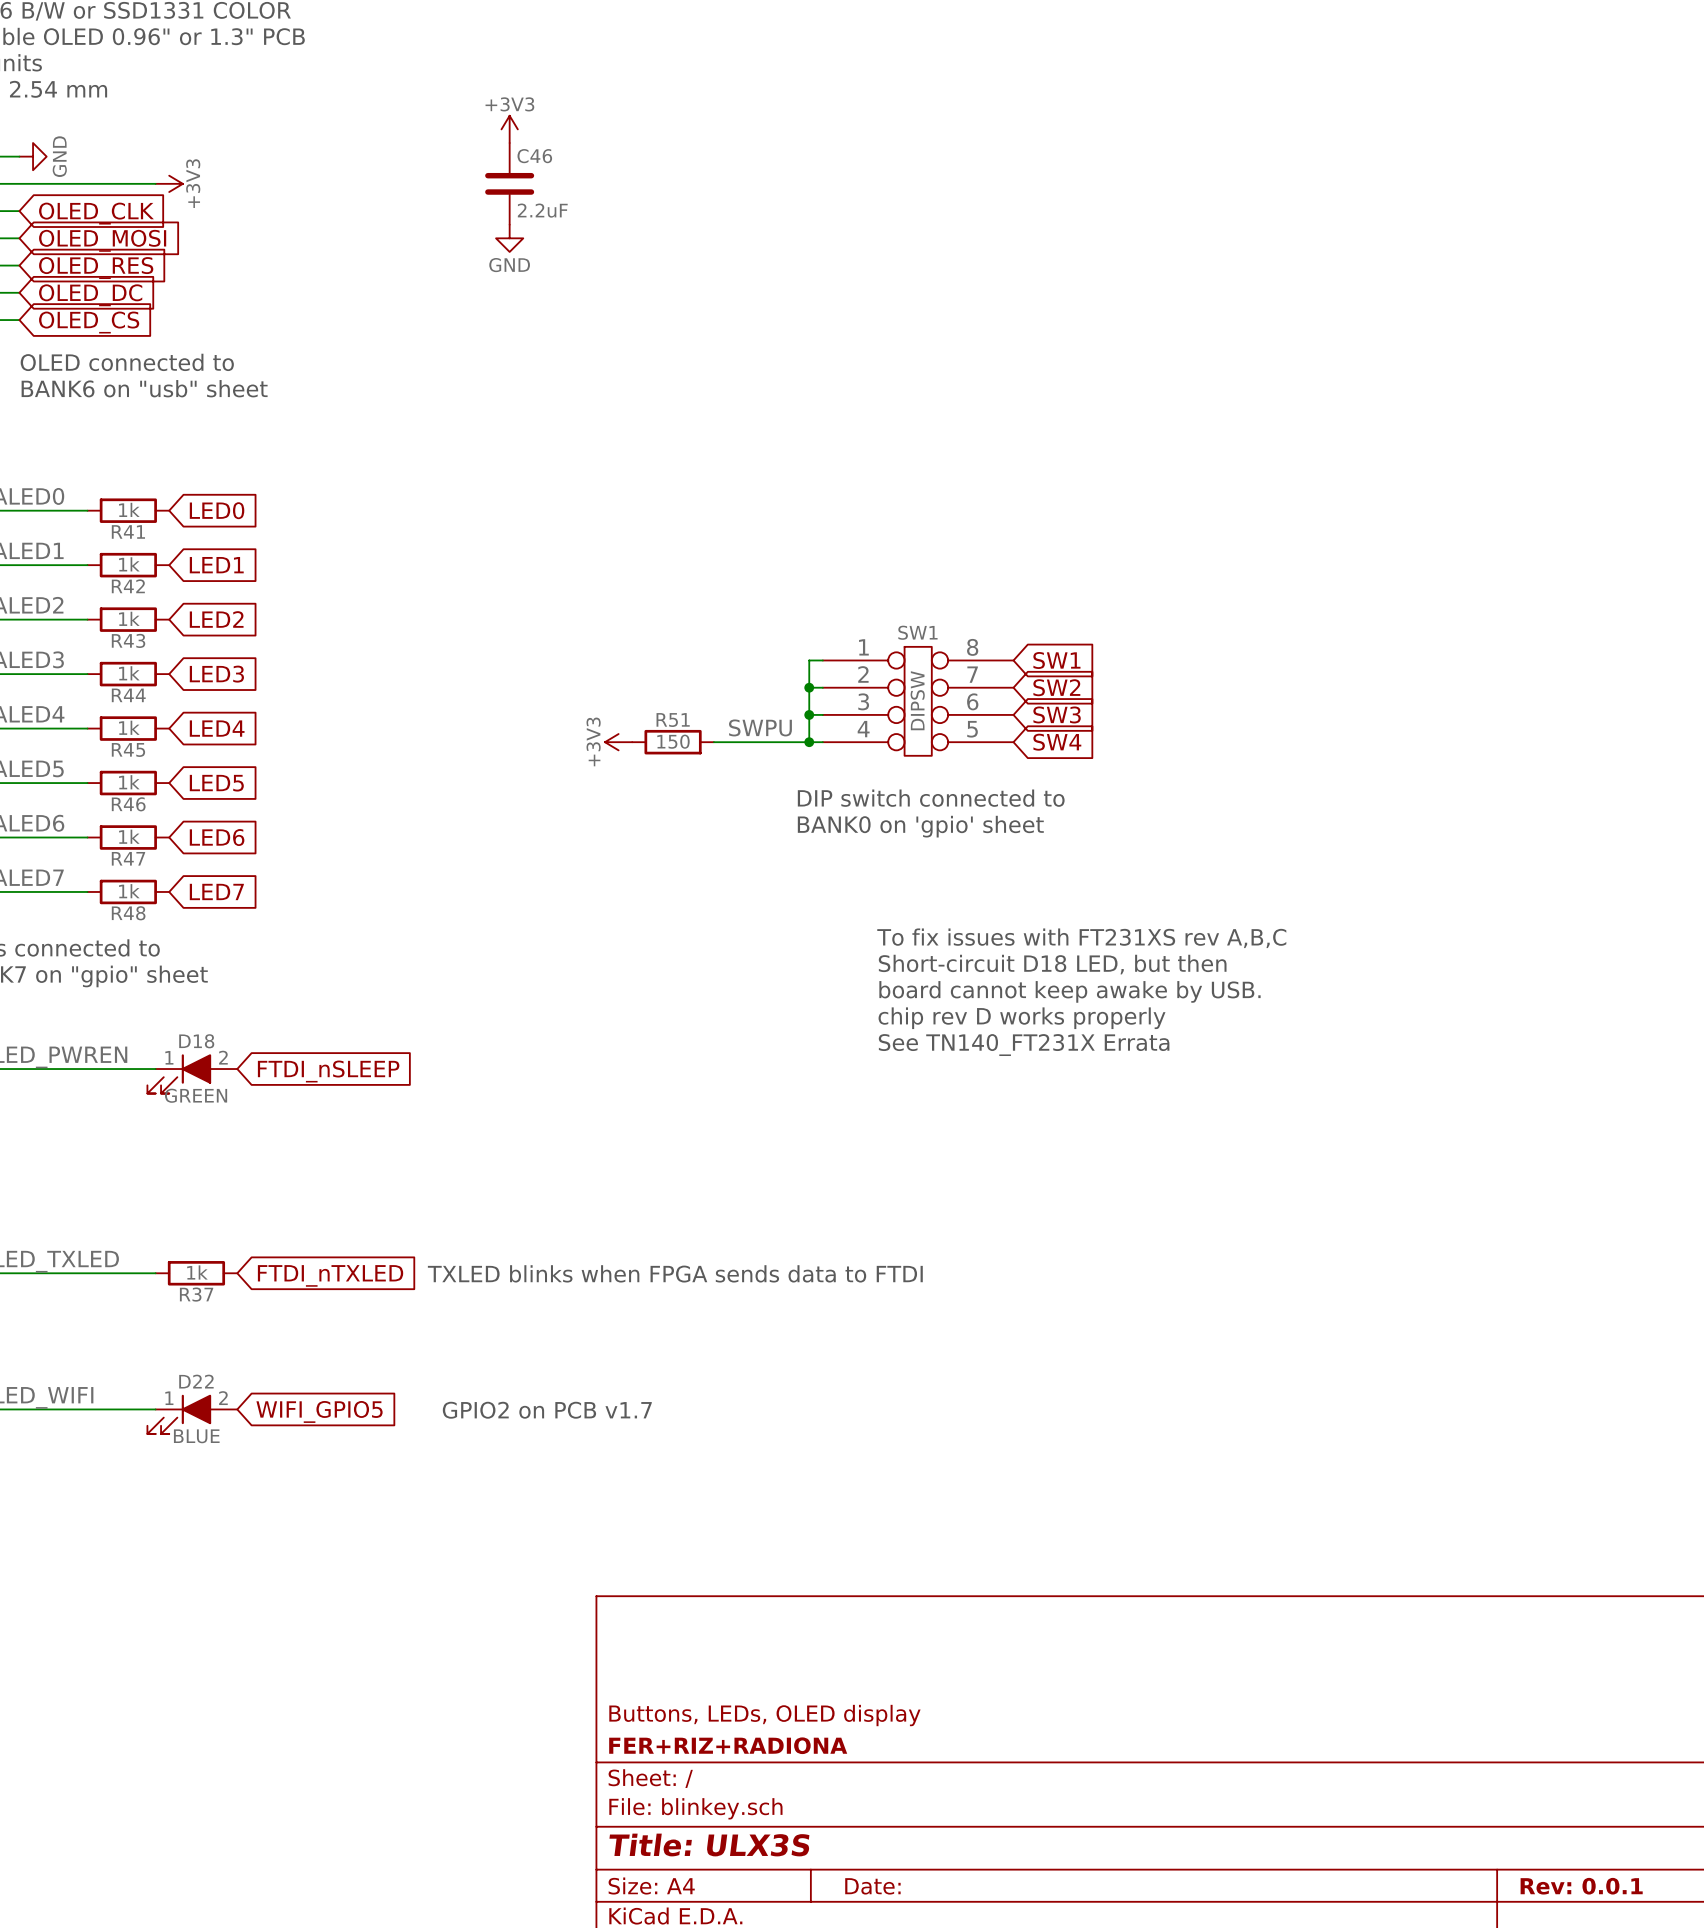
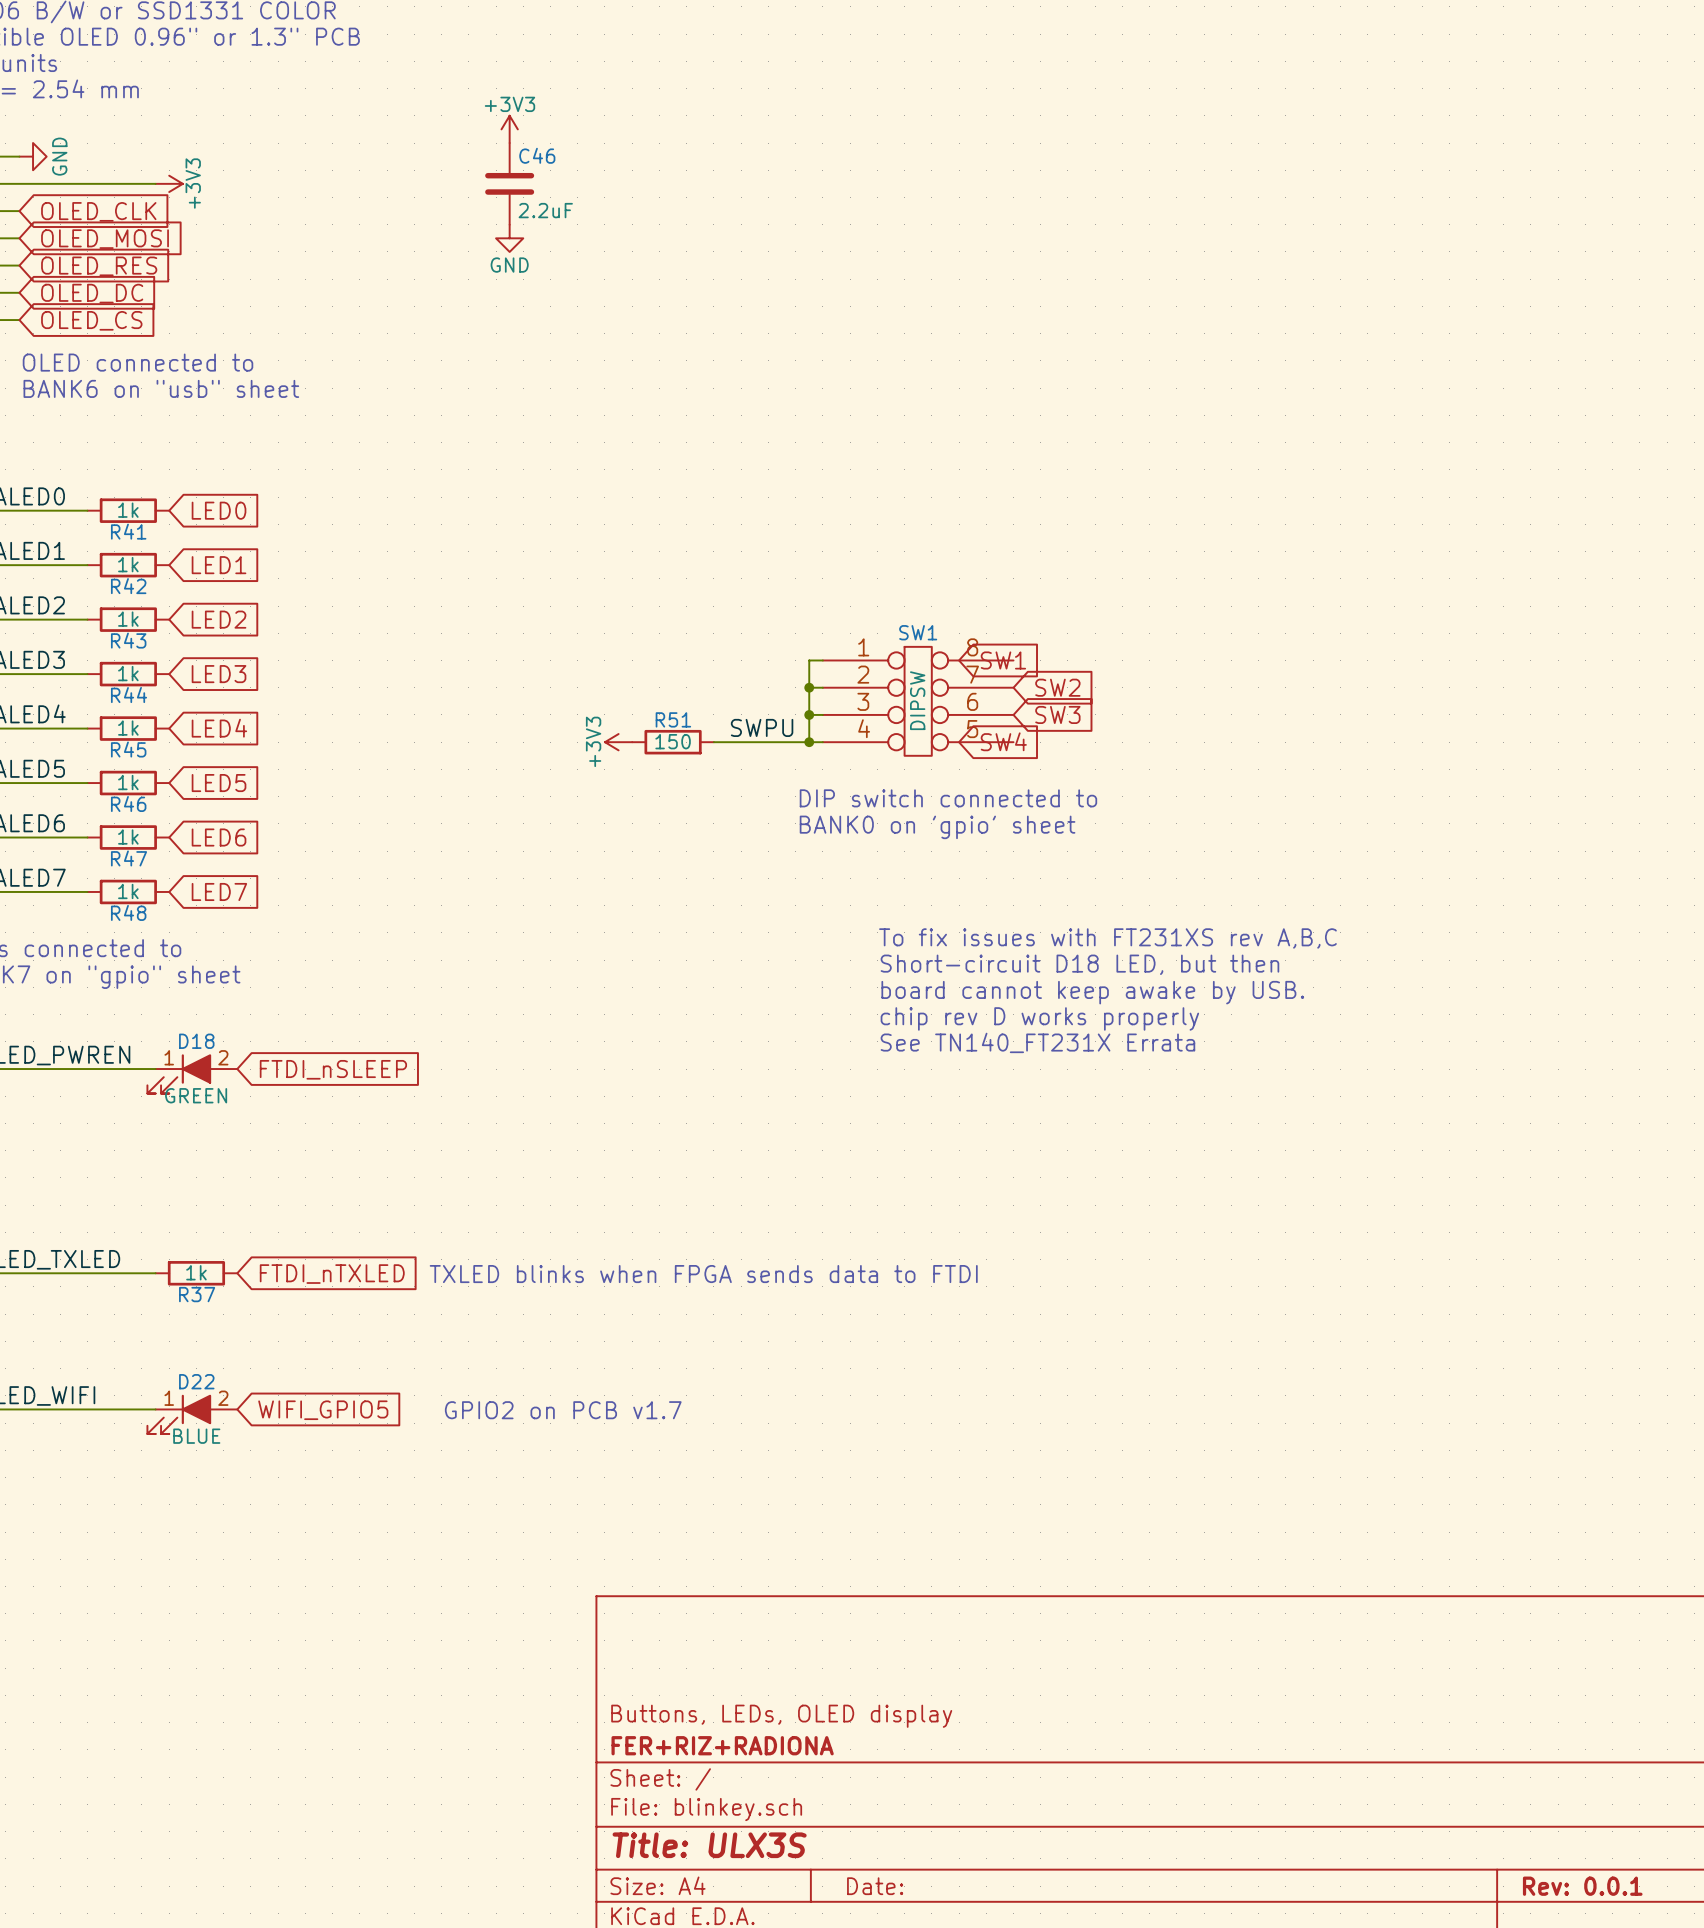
global label position: SW1 (1056, 660) -> SW1 (1003, 660)
global label position: SW4 (1057, 742) -> SW4 (1003, 741)

